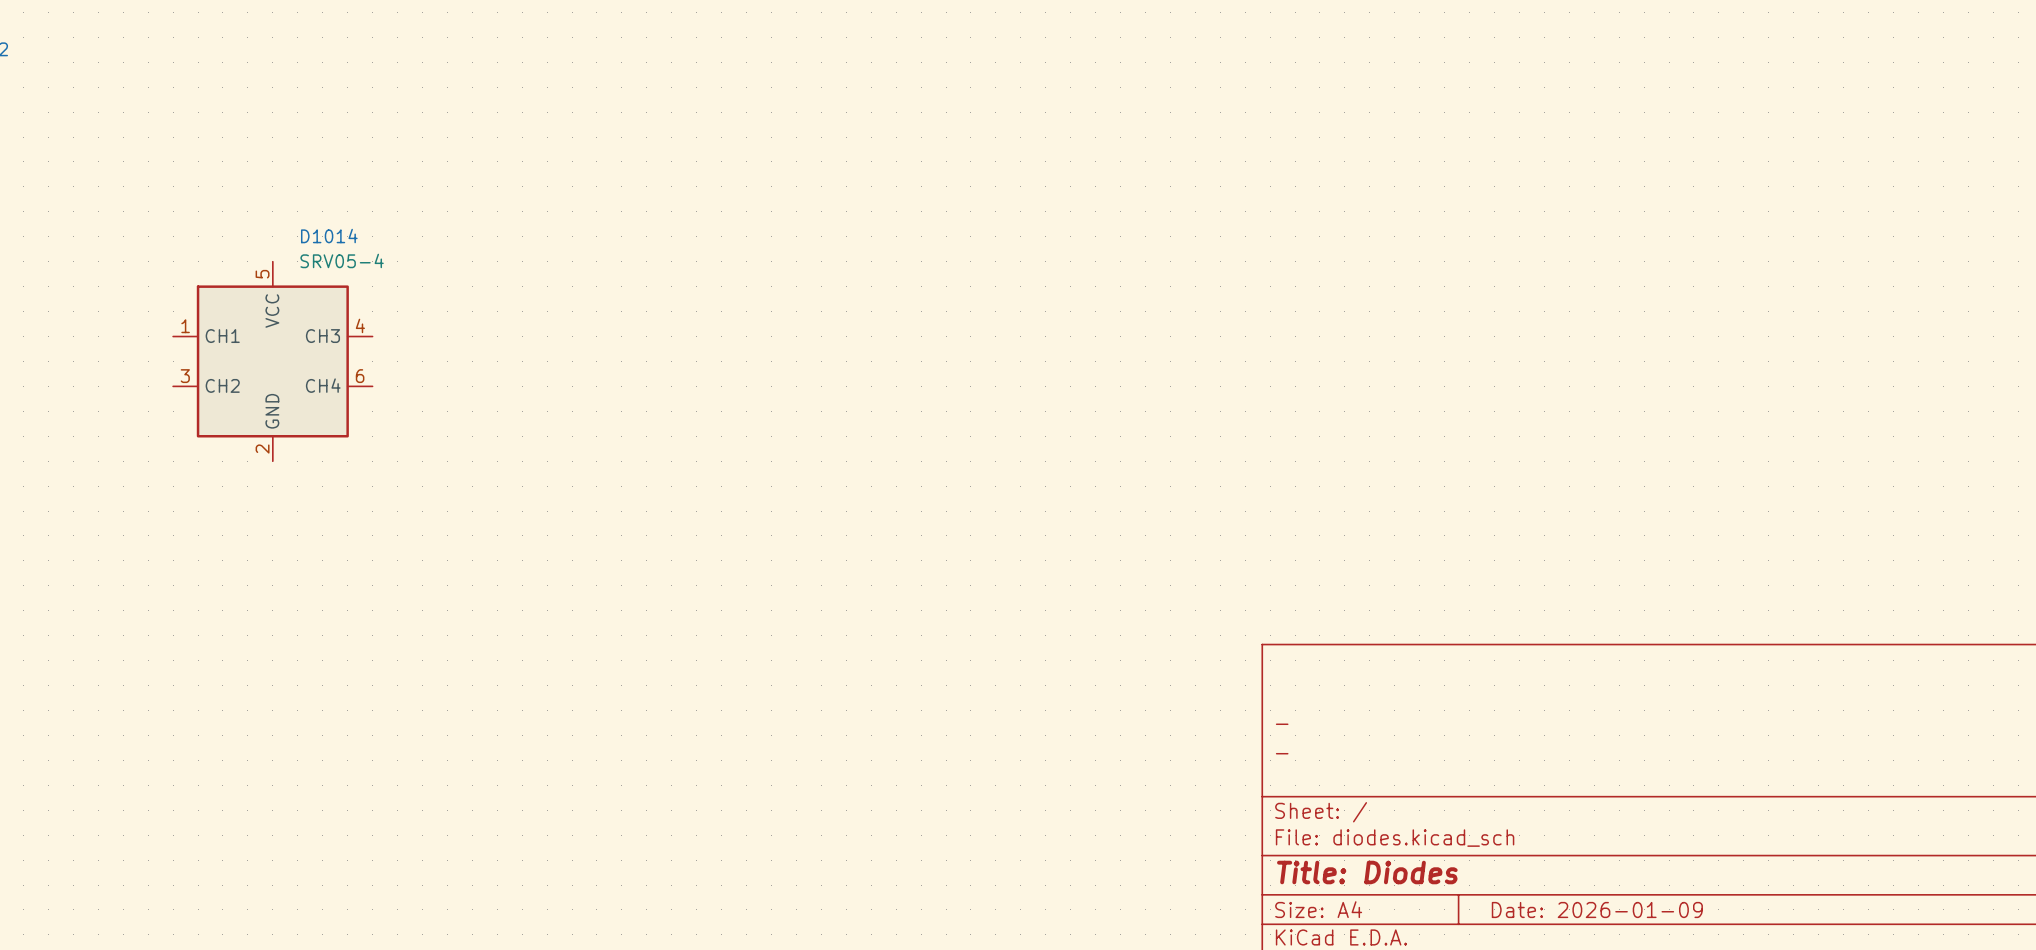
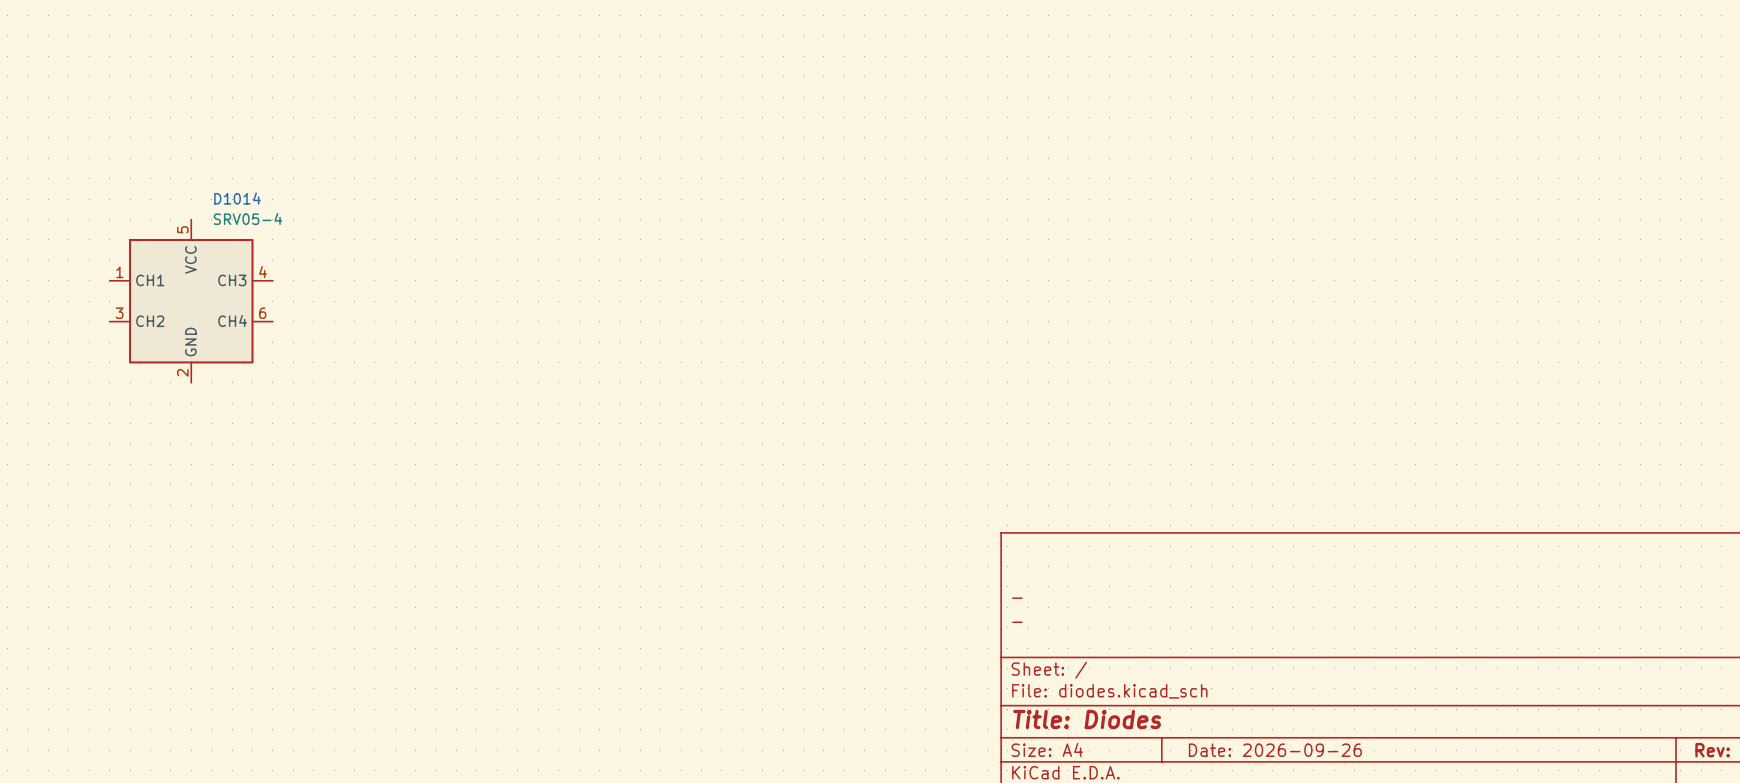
title block: Date: 2026-01-09 (1597, 909) -> Date: 2026-09-26 (1275, 750)

